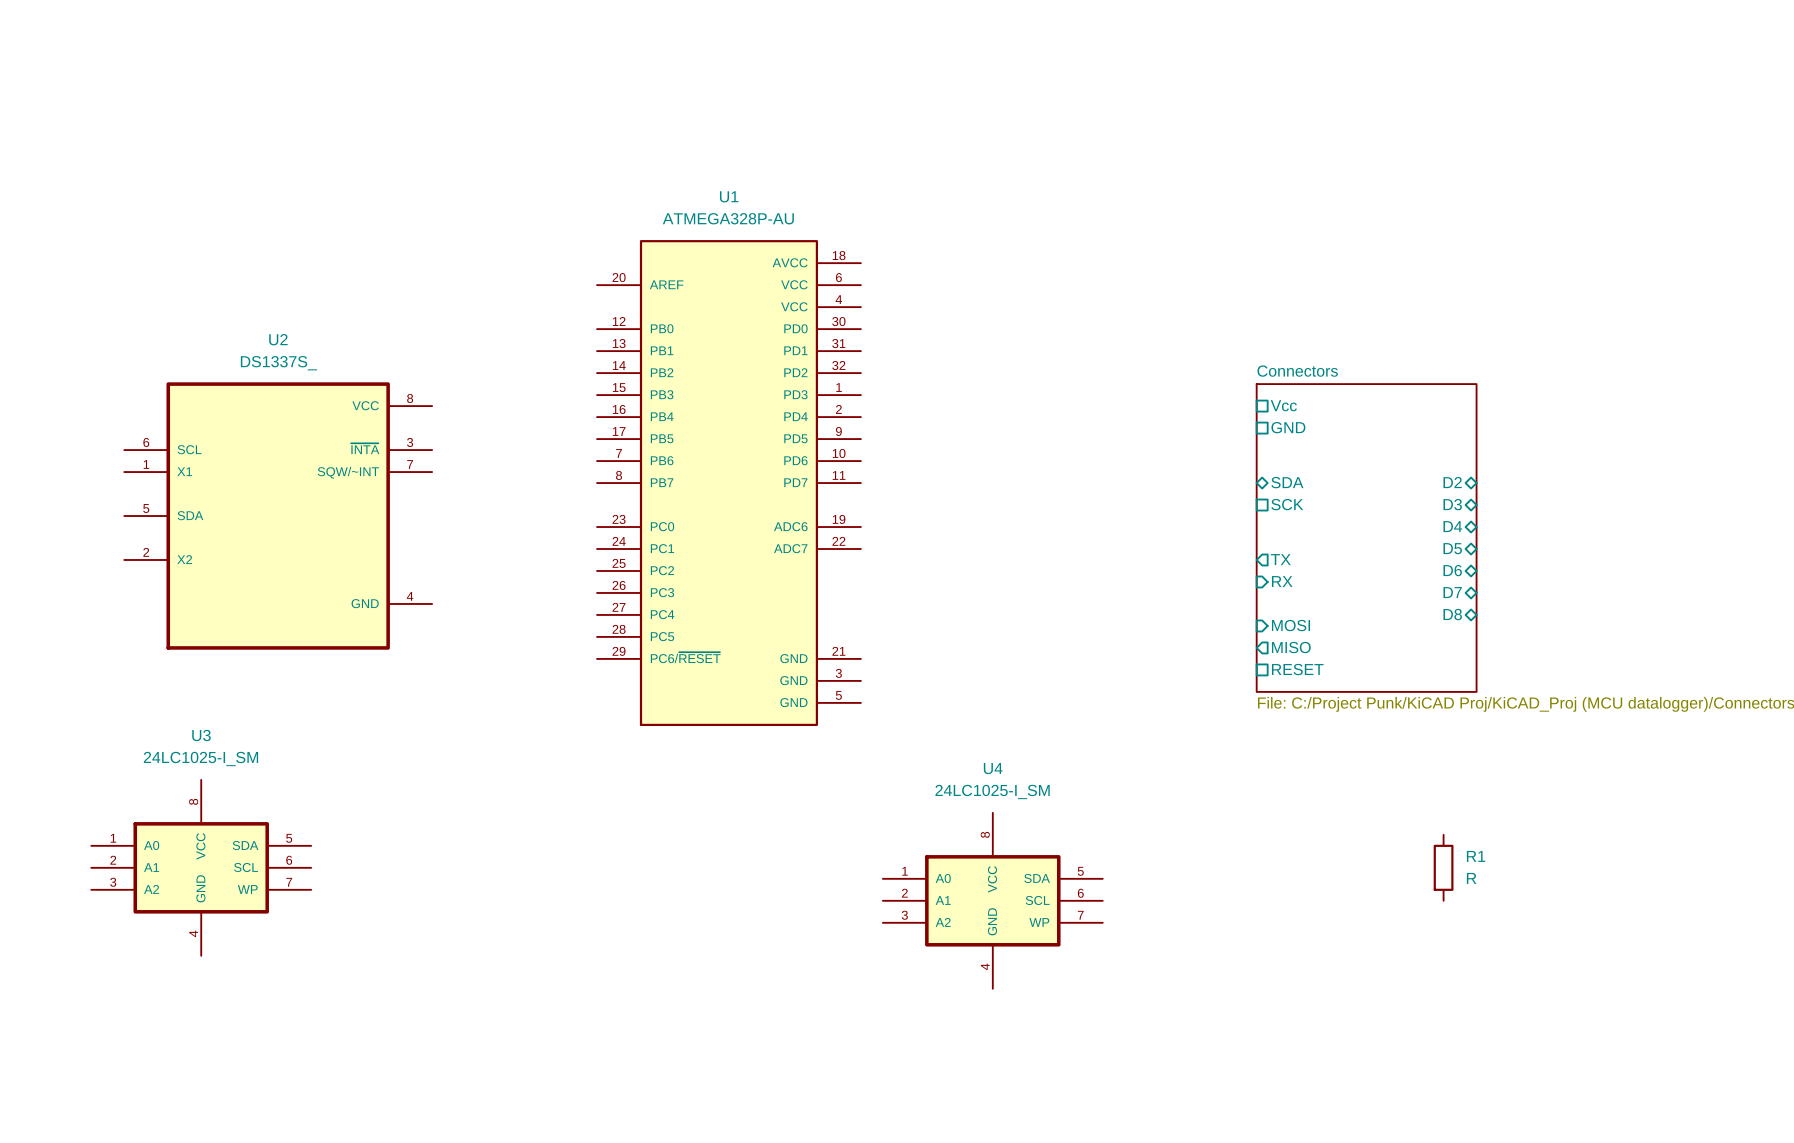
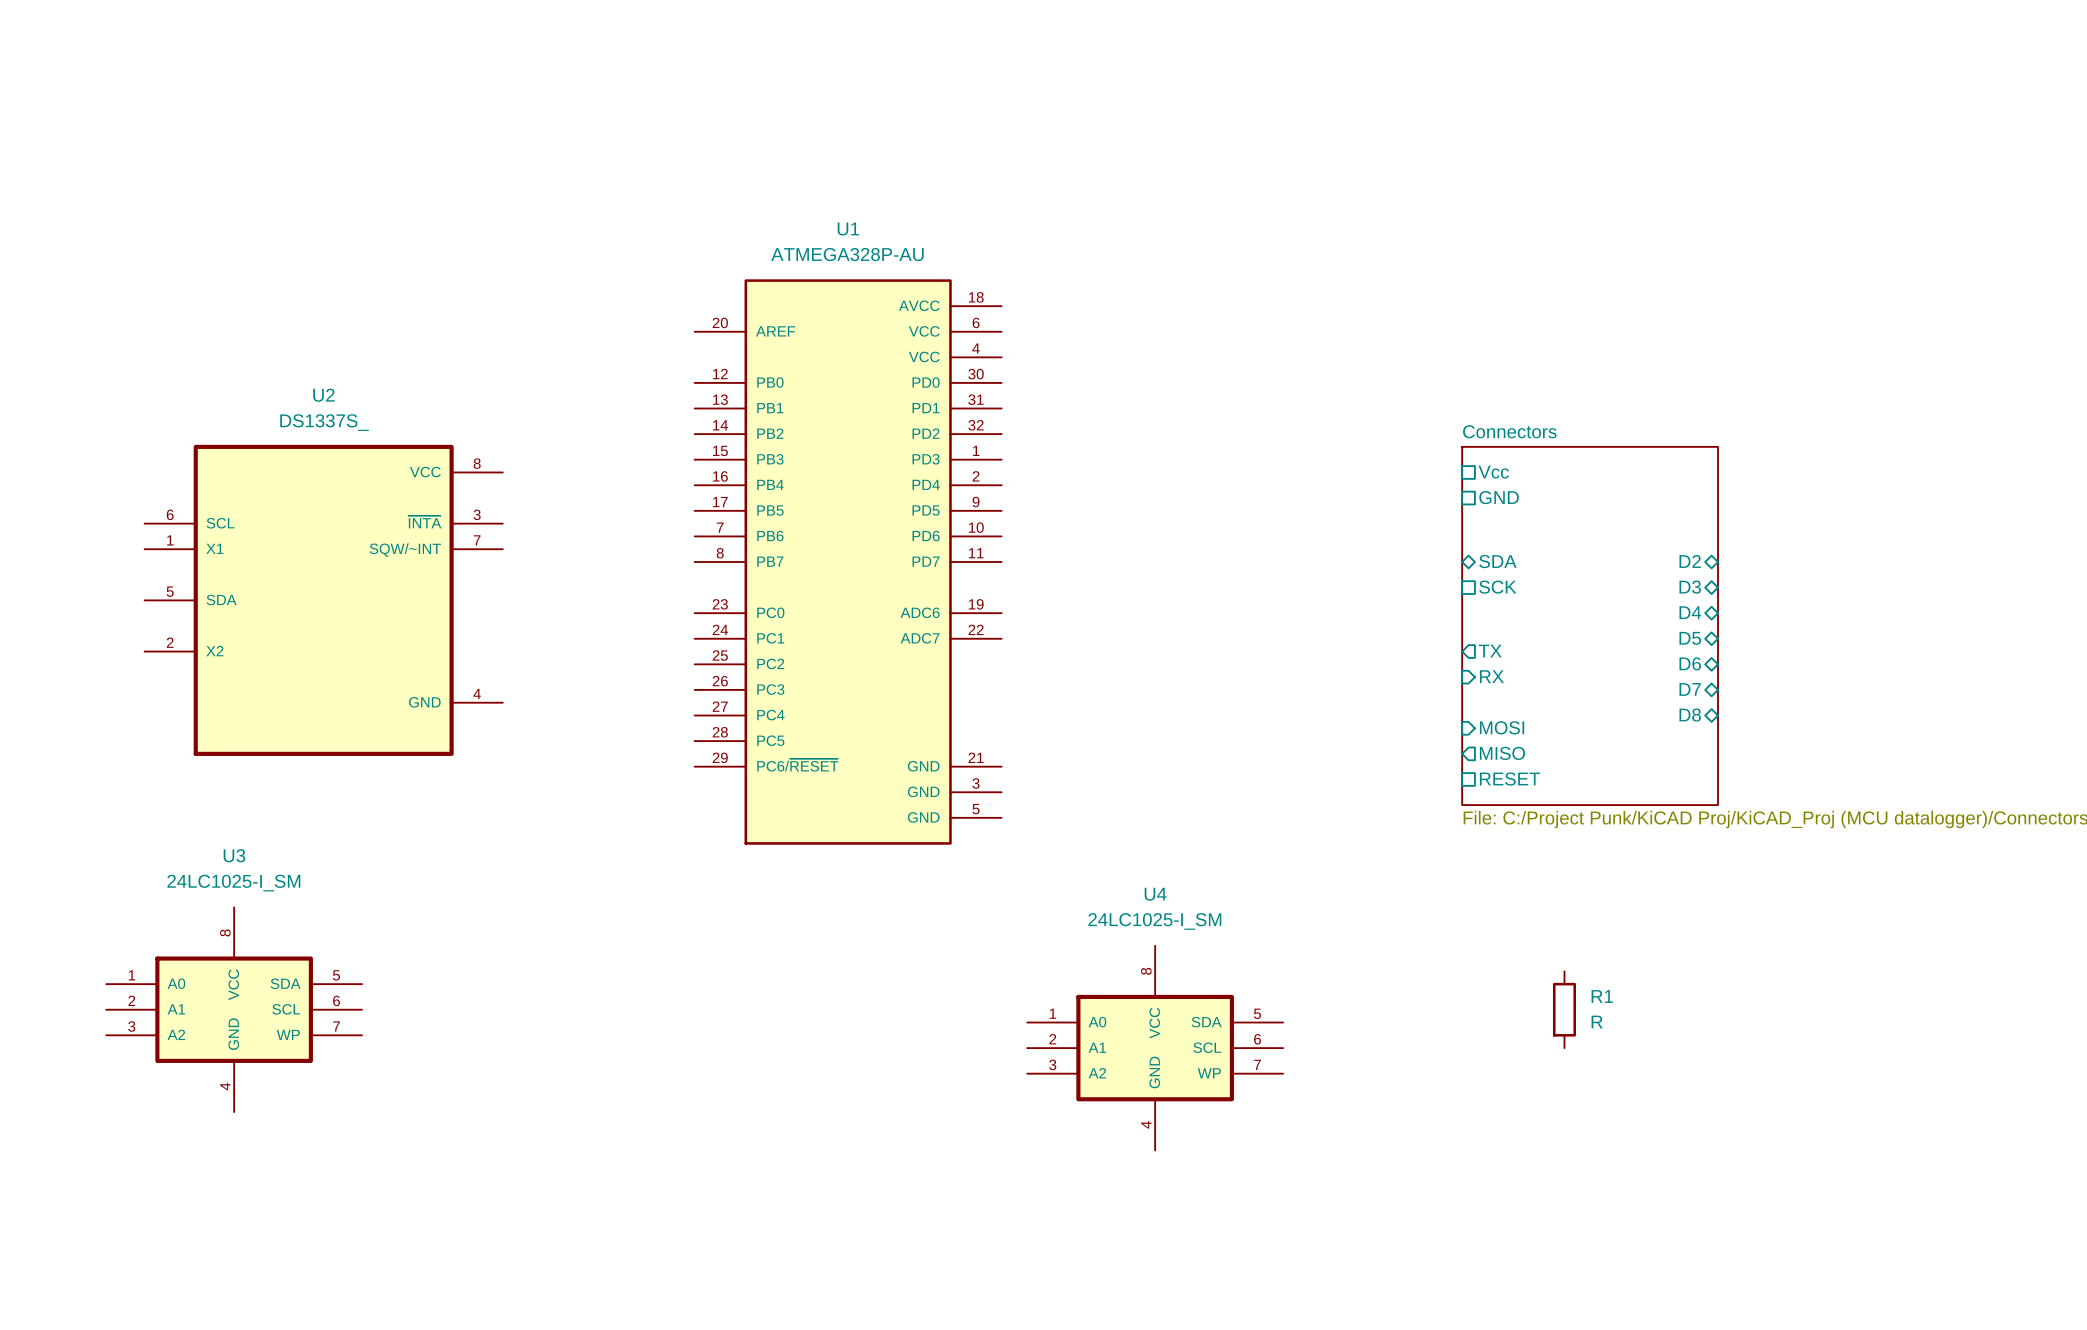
R1 position: (1443, 867) -> (1564, 1009)

